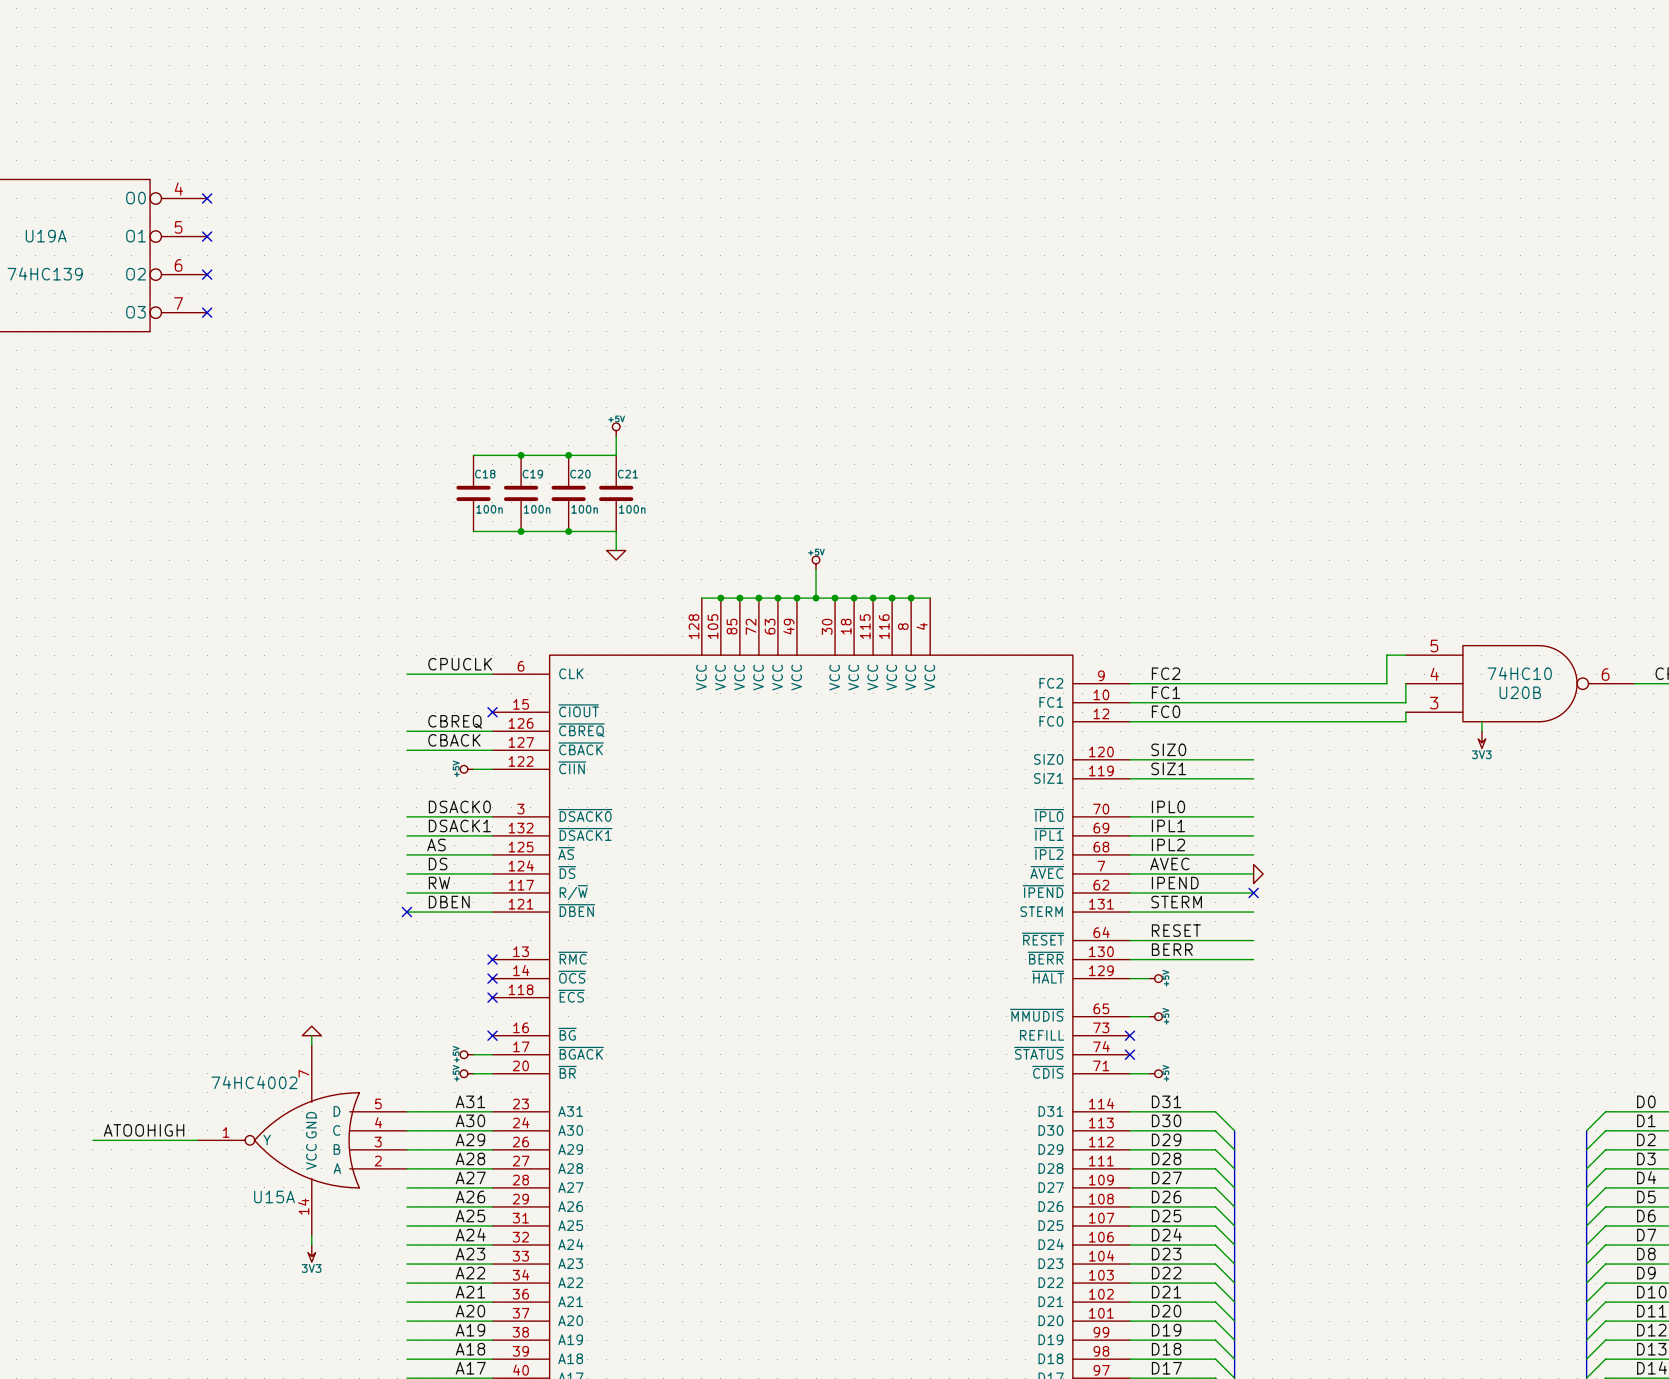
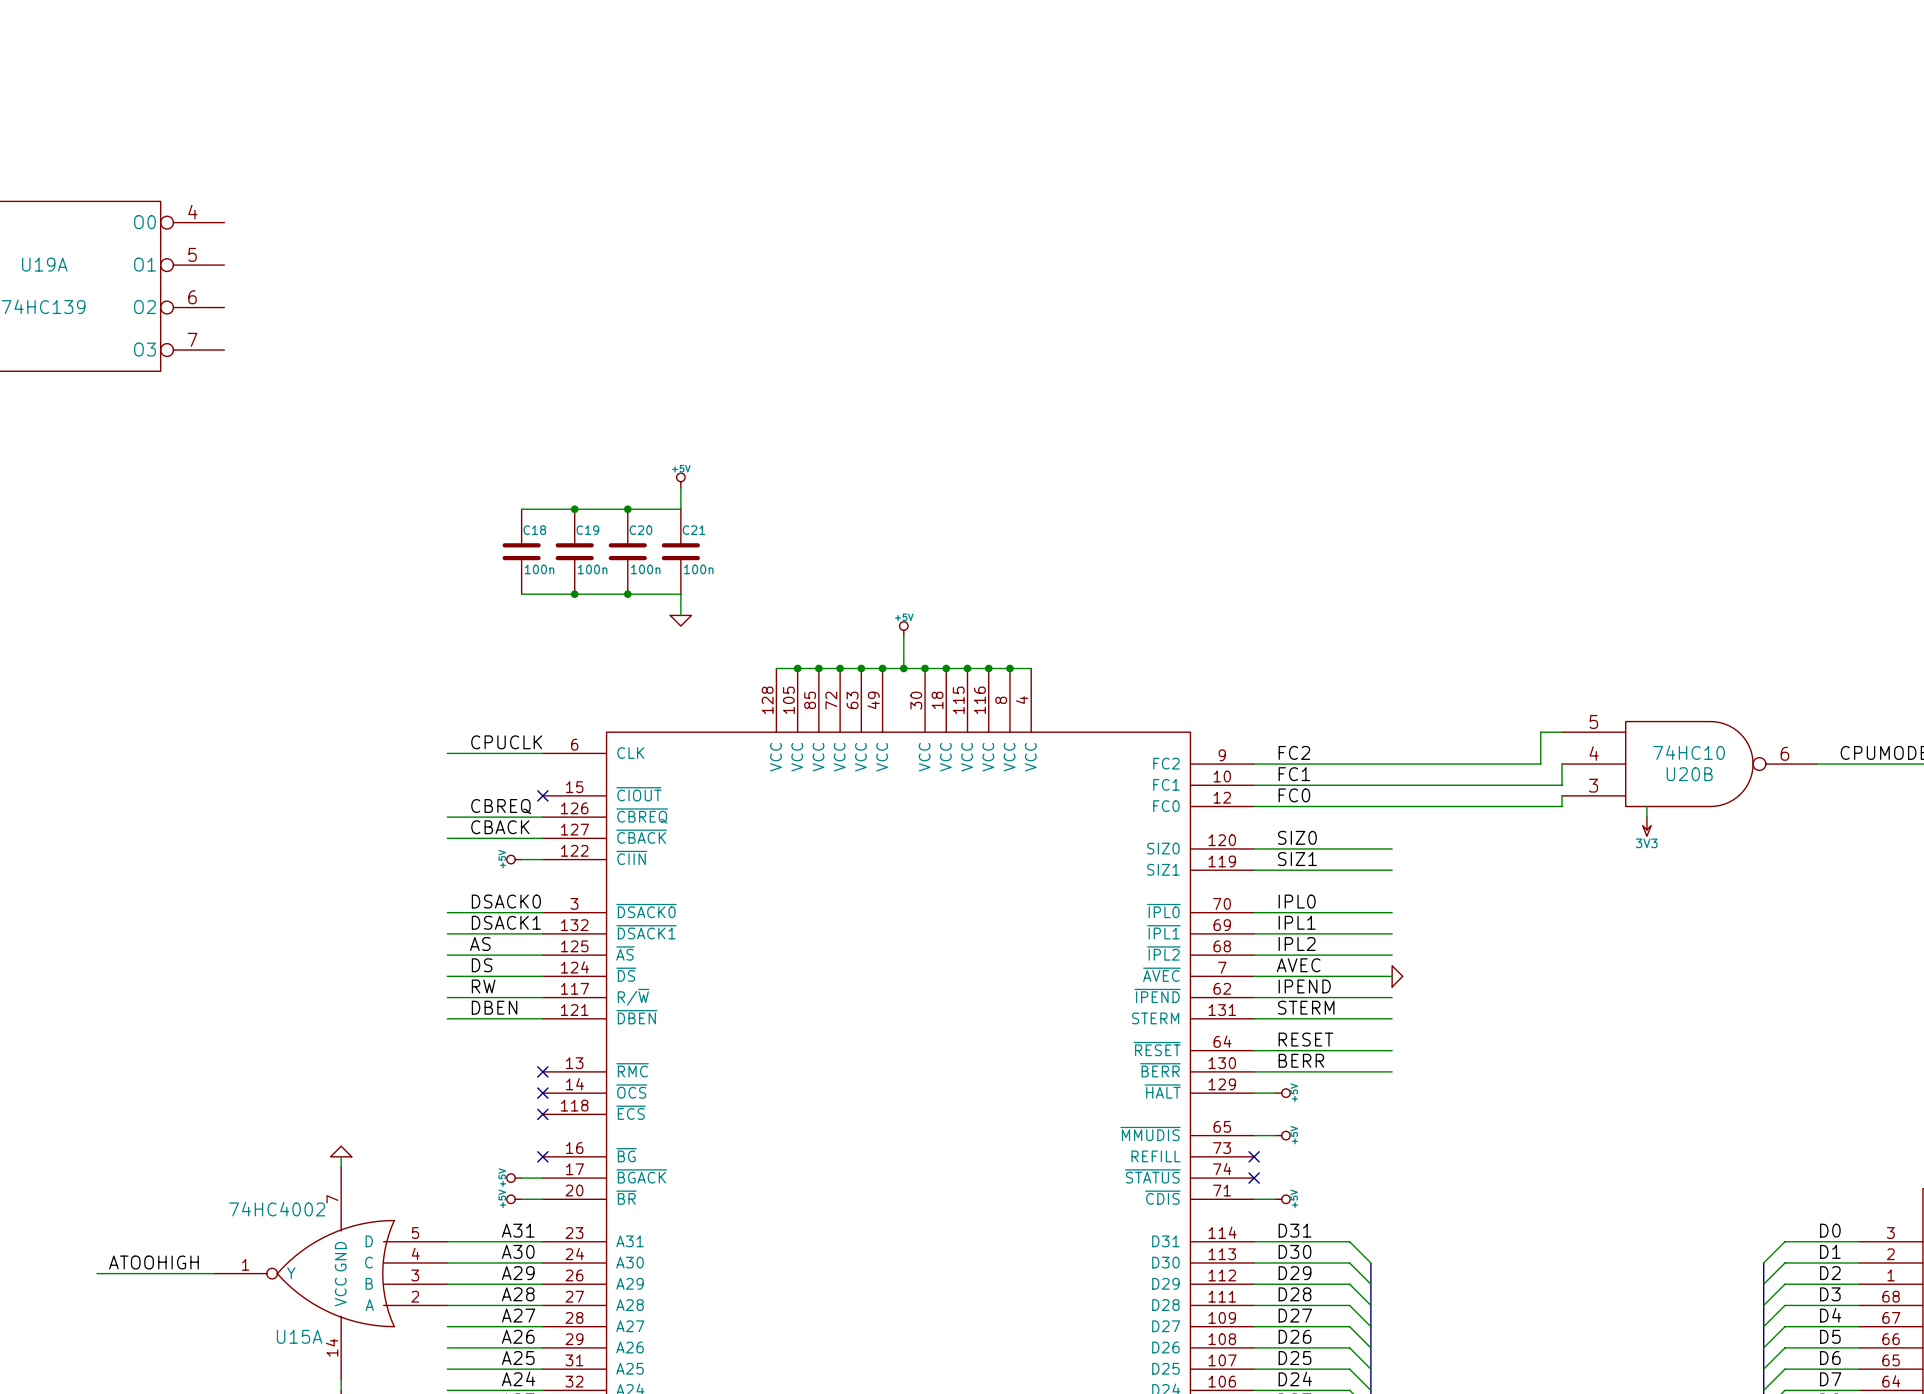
no-connect mark: (207, 198) -> none
no-connect mark: (207, 236) -> none
no-connect mark: (207, 274) -> none
no-connect mark: (207, 312) -> none
no-connect mark: (1253, 892) -> none
no-connect mark: (406, 912) -> none

